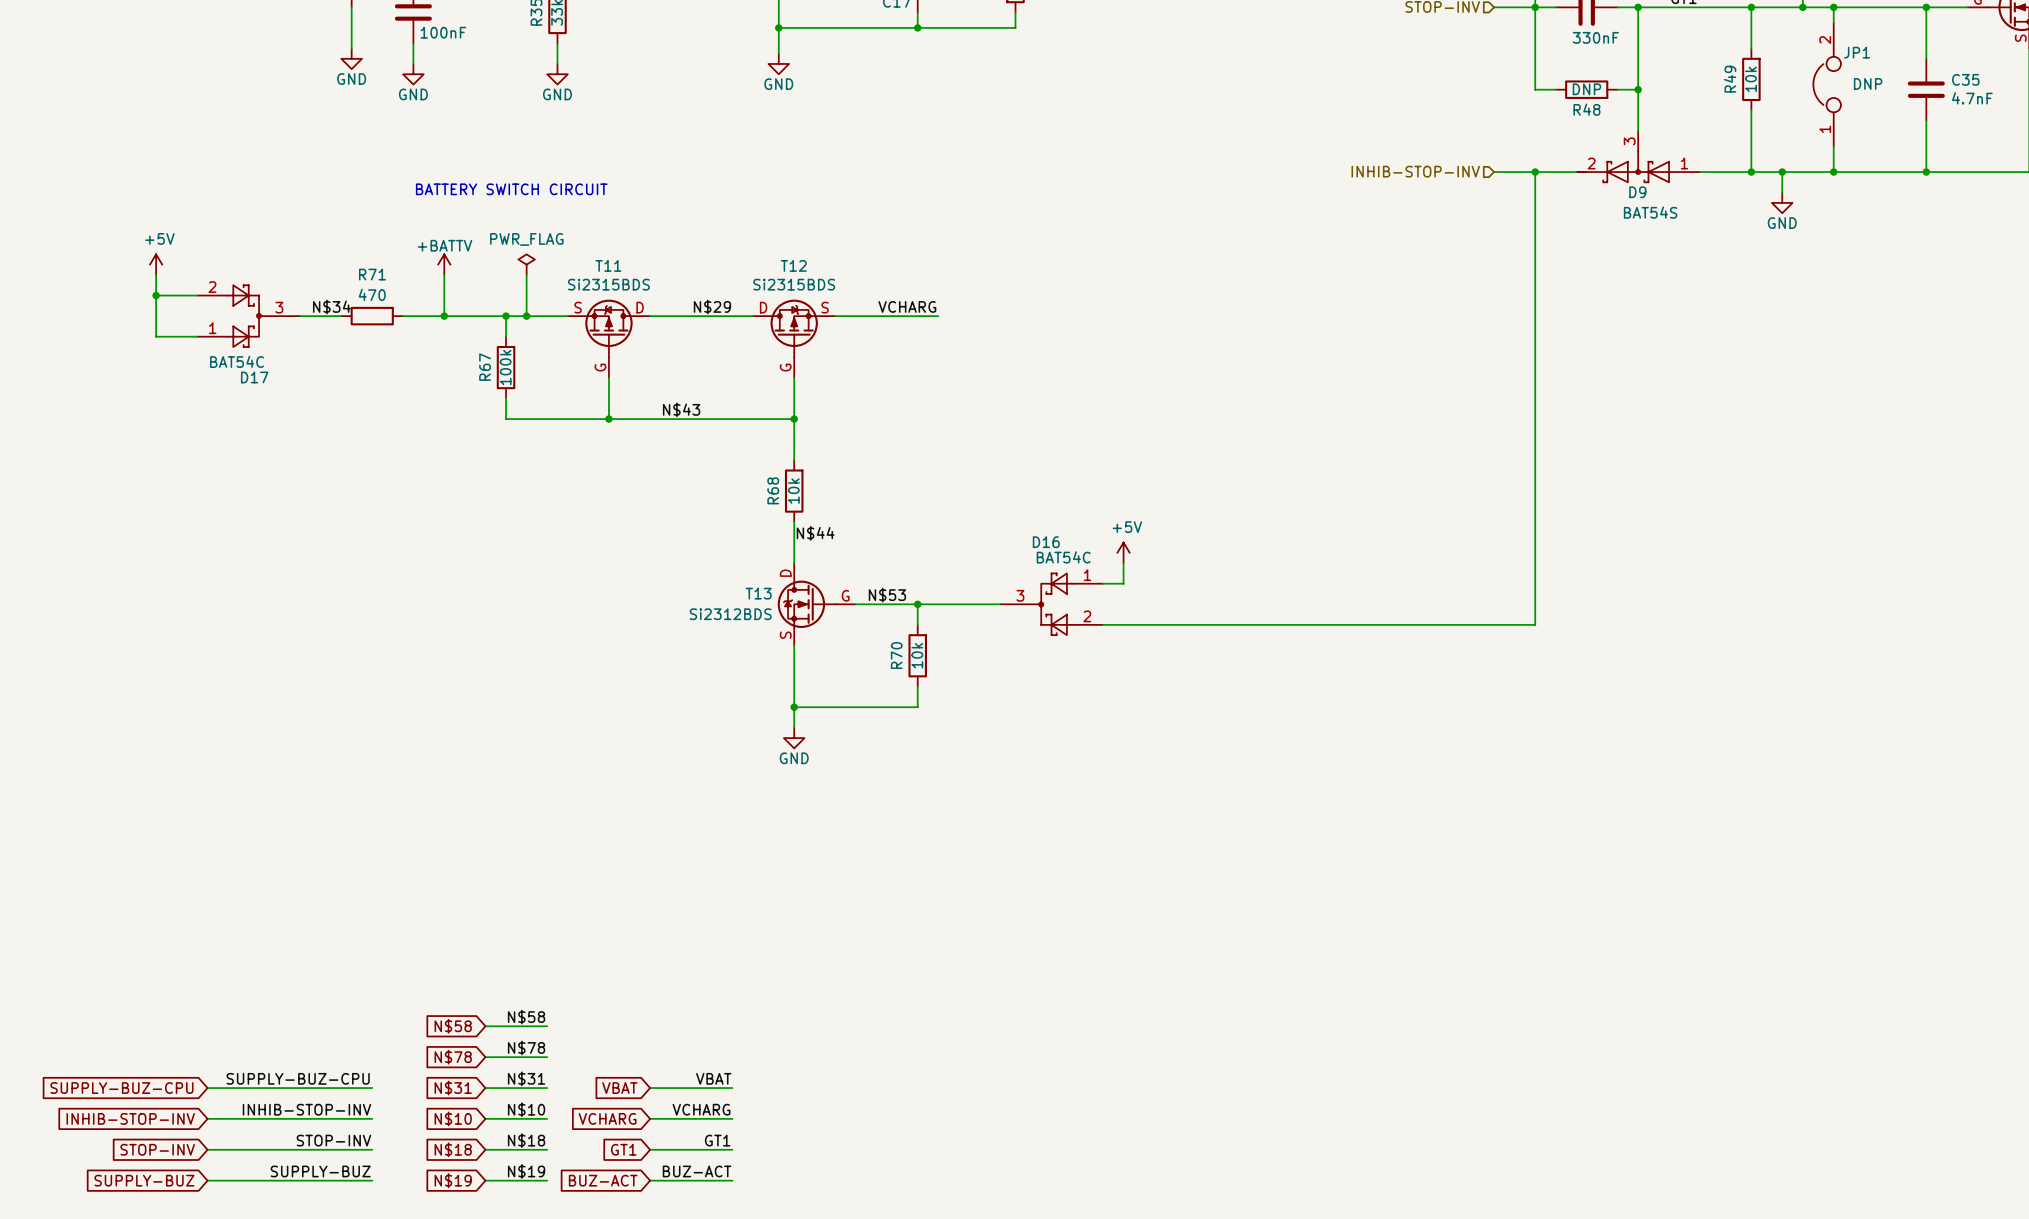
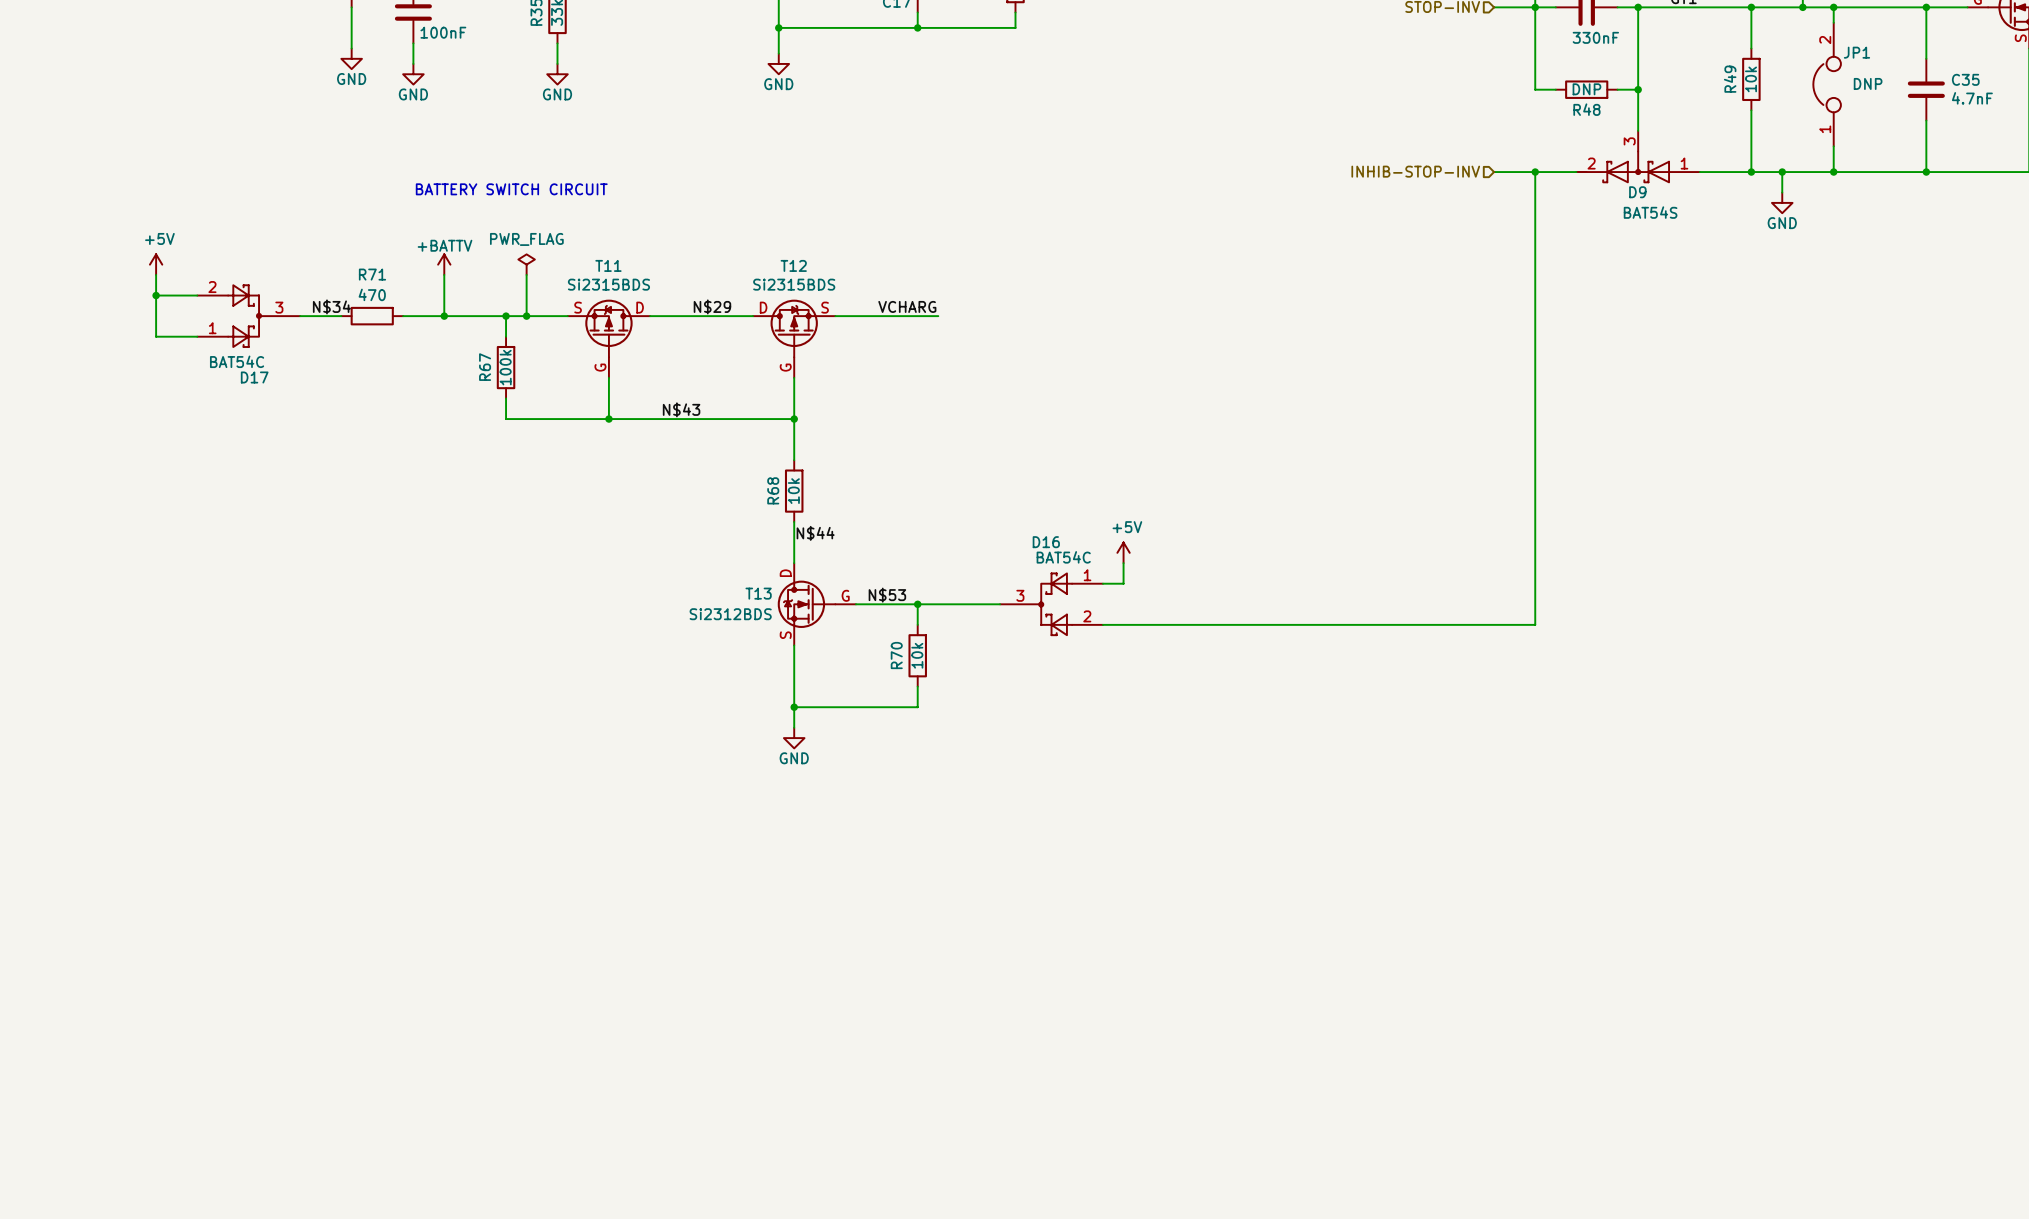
label: N$58 (526, 1017) -> none
global label: N$58 (453, 1026) -> none
wire: (485, 1026) (547, 1026) -> none
label: N$78 (526, 1047) -> none
global label: N$78 (453, 1057) -> none
wire: (485, 1057) (547, 1057) -> none
label: SUPPLY-BUZ-CPU (298, 1078) -> none
label: N$31 (526, 1078) -> none
label: VBAT (713, 1078) -> none
global label: SUPPLY-BUZ-CPU (121, 1088) -> none
wire: (207, 1088) (372, 1088) -> none
global label: N$31 (453, 1088) -> none
wire: (485, 1088) (547, 1088) -> none
global label: VBAT (619, 1088) -> none
wire: (650, 1088) (732, 1088) -> none
label: INHIB-STOP-INV (306, 1109) -> none
label: N$10 (526, 1109) -> none
label: VCHARG (701, 1109) -> none
global label: INHIB-STOP-INV (130, 1118) -> none
wire: (207, 1118) (372, 1118) -> none
global label: N$10 (453, 1118) -> none
wire: (485, 1118) (547, 1118) -> none
global label: VCHARG (607, 1118) -> none
wire: (650, 1118) (732, 1118) -> none
label: STOP-INV (333, 1140) -> none
label: N$18 (526, 1140) -> none
label: GT1 (717, 1140) -> none
global label: STOP-INV (157, 1149) -> none
wire: (207, 1149) (372, 1149) -> none
global label: N$18 (453, 1149) -> none
wire: (485, 1149) (547, 1149) -> none
global label: GT1 (623, 1149) -> none
wire: (650, 1149) (732, 1149) -> none
label: SUPPLY-BUZ (320, 1171) -> none
label: N$19 (526, 1171) -> none
label: BUZ-ACT (697, 1171) -> none
global label: SUPPLY-BUZ (144, 1180) -> none
wire: (207, 1180) (372, 1180) -> none
global label: N$19 (453, 1180) -> none
wire: (485, 1180) (547, 1180) -> none
global label: BUZ-ACT (603, 1180) -> none
wire: (650, 1180) (732, 1180) -> none

